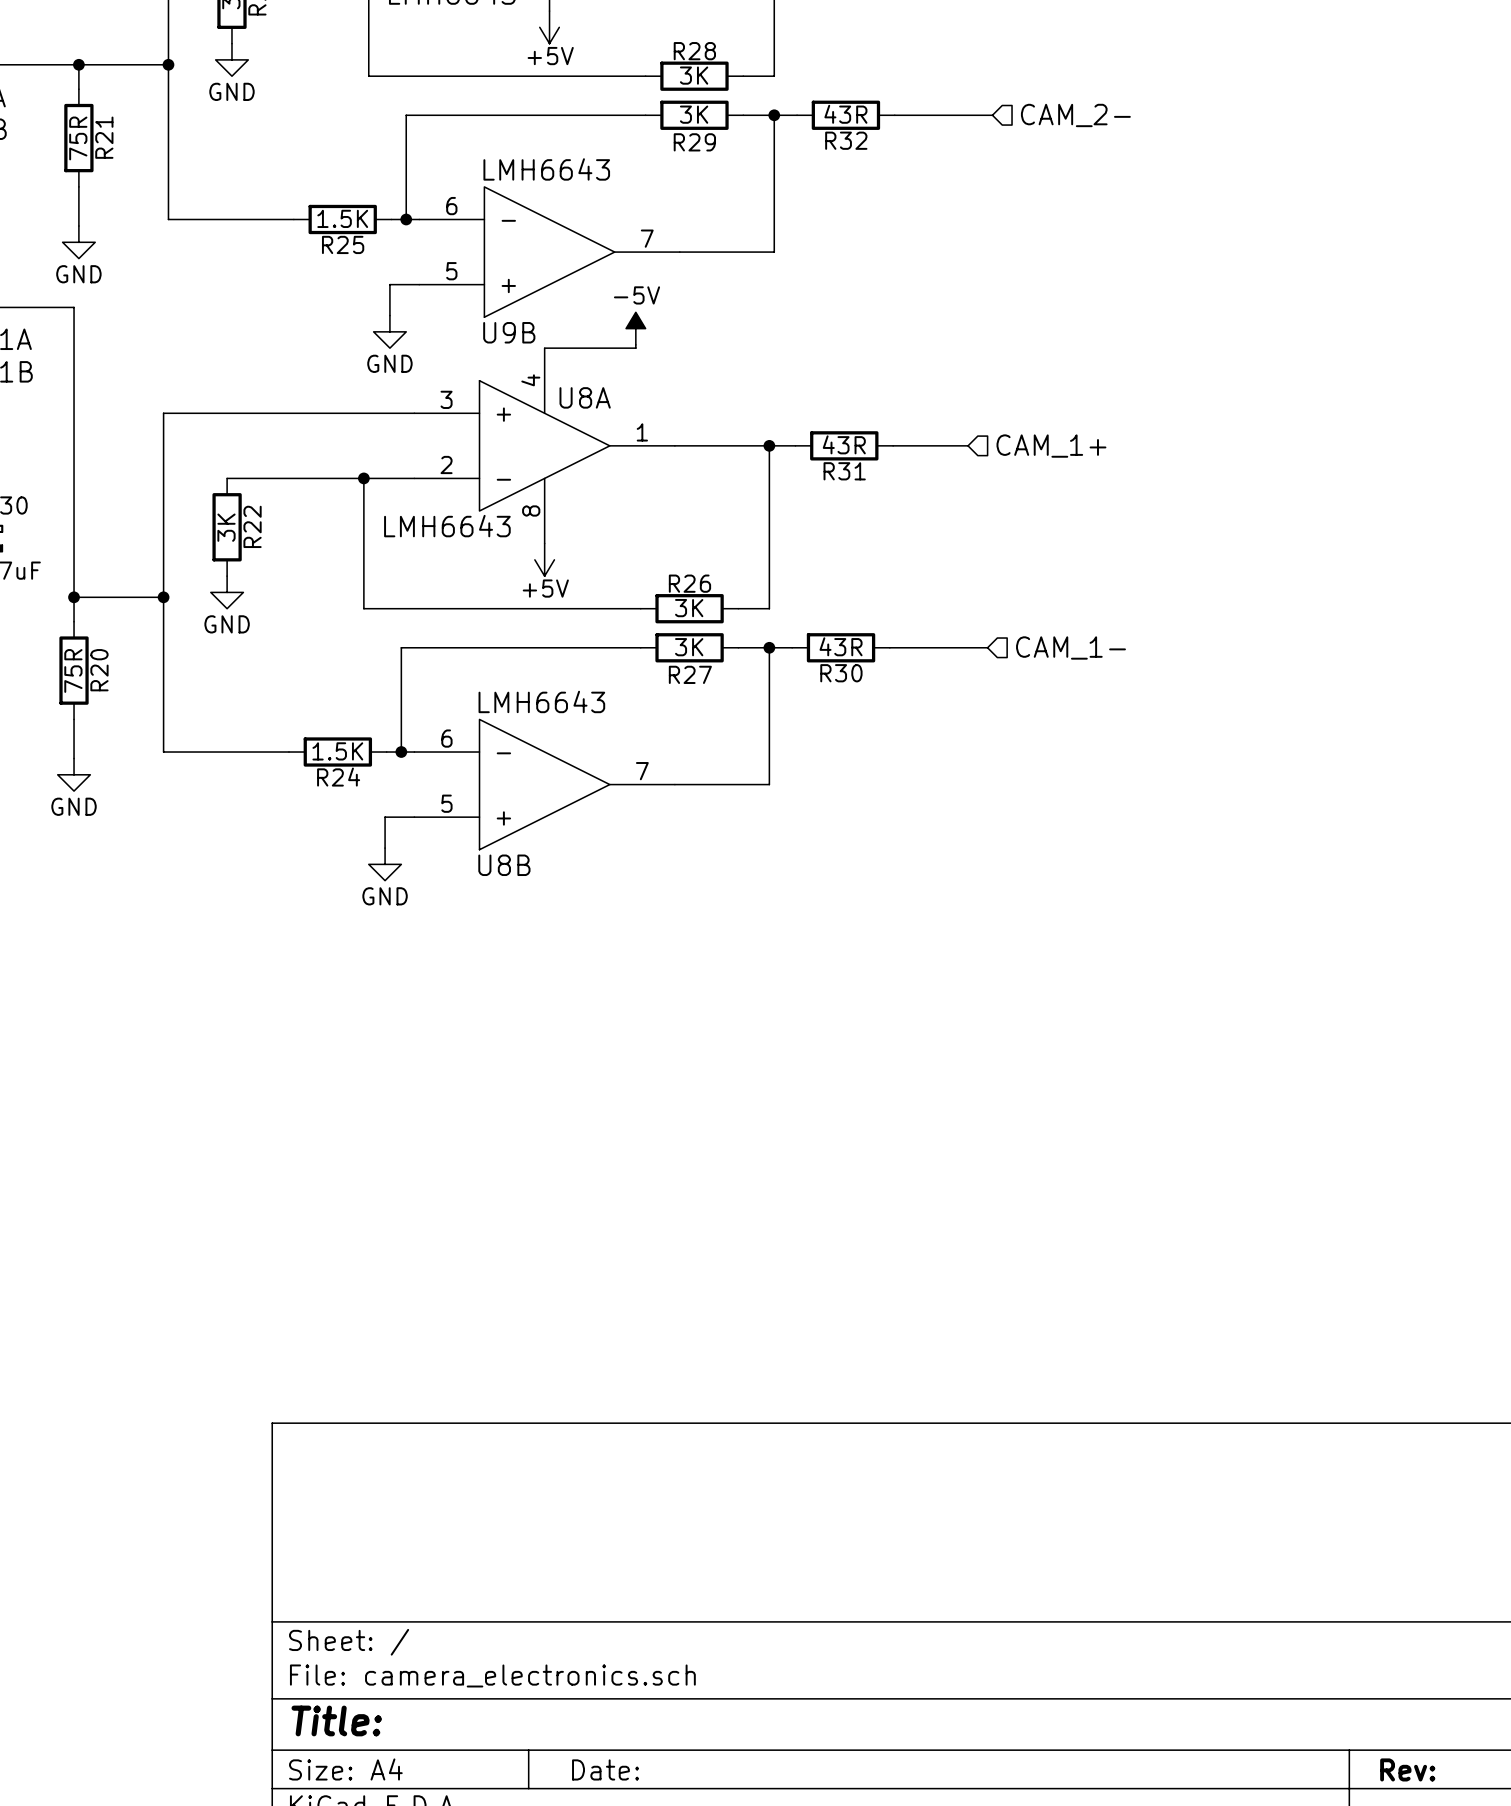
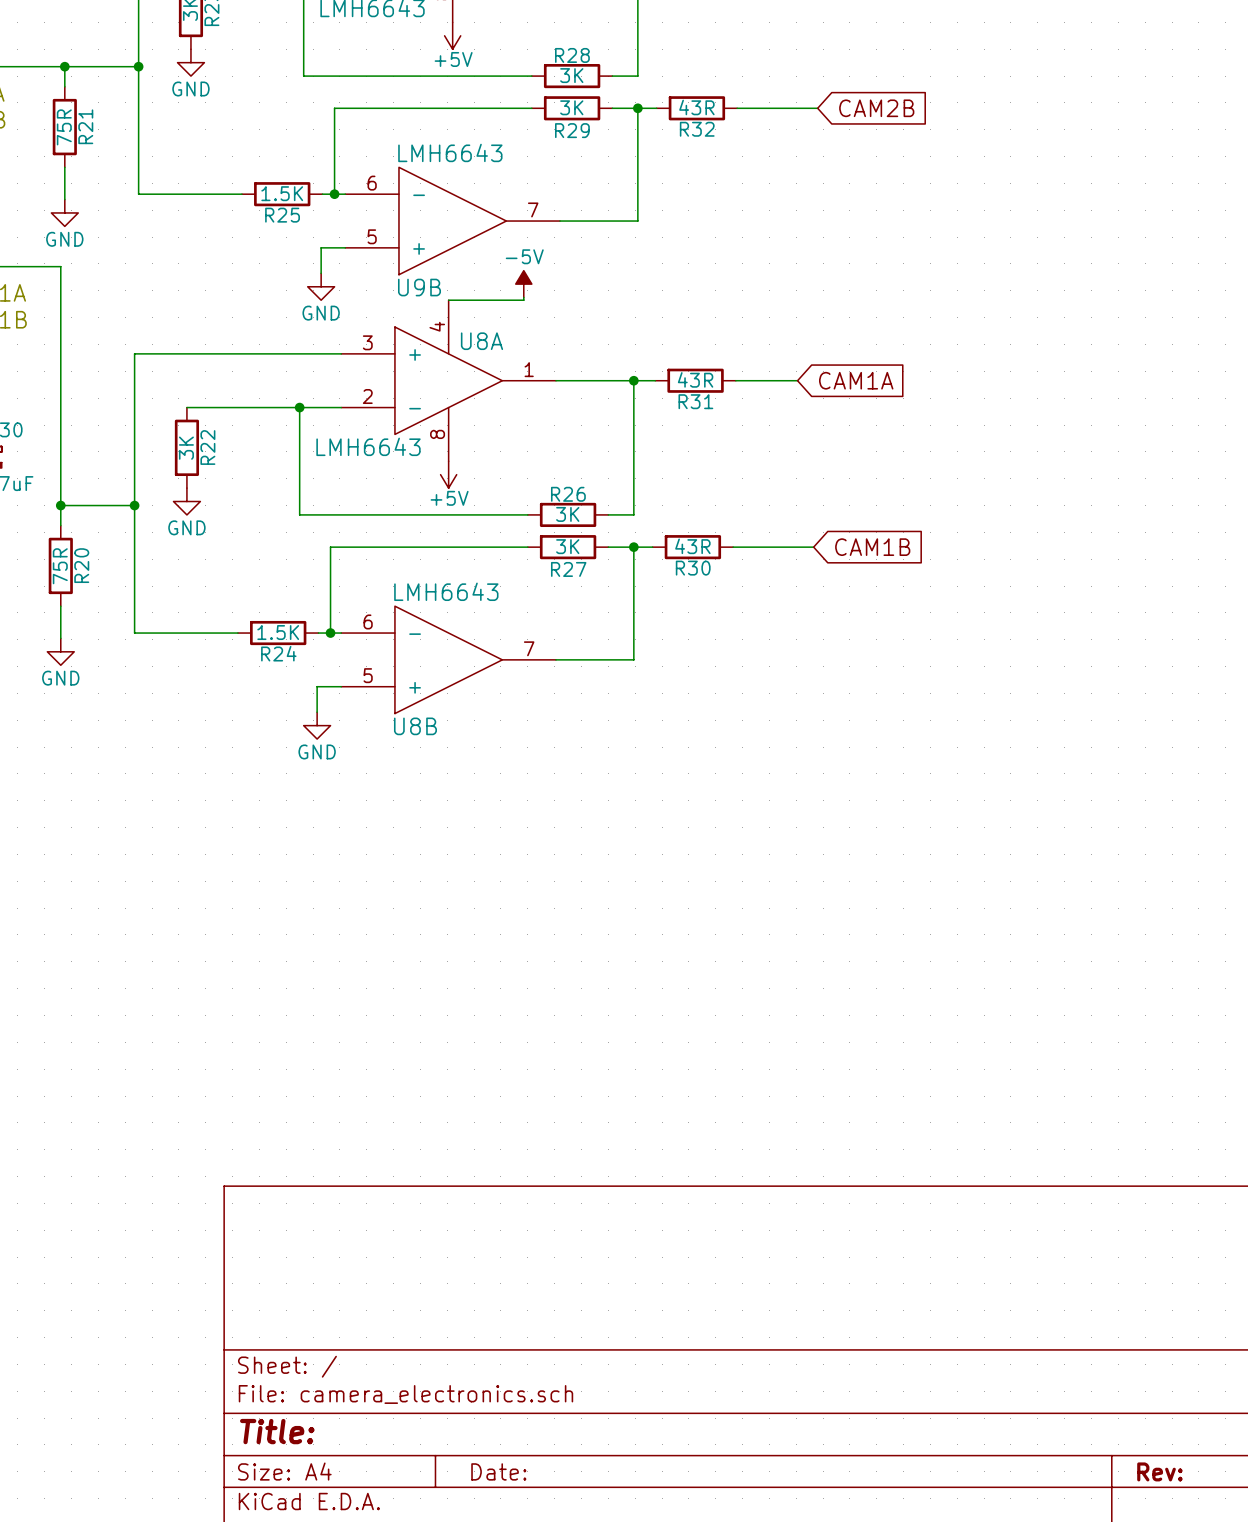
global label: none -> CAM2B (876, 108)
hierarchical label: CAM_2- (1075, 115) -> none
global label: none -> CAM1A (856, 380)
hierarchical label: CAM_1+ (1051, 446) -> none
global label: none -> CAM1B (872, 547)
hierarchical label: CAM_1- (1071, 647) -> none

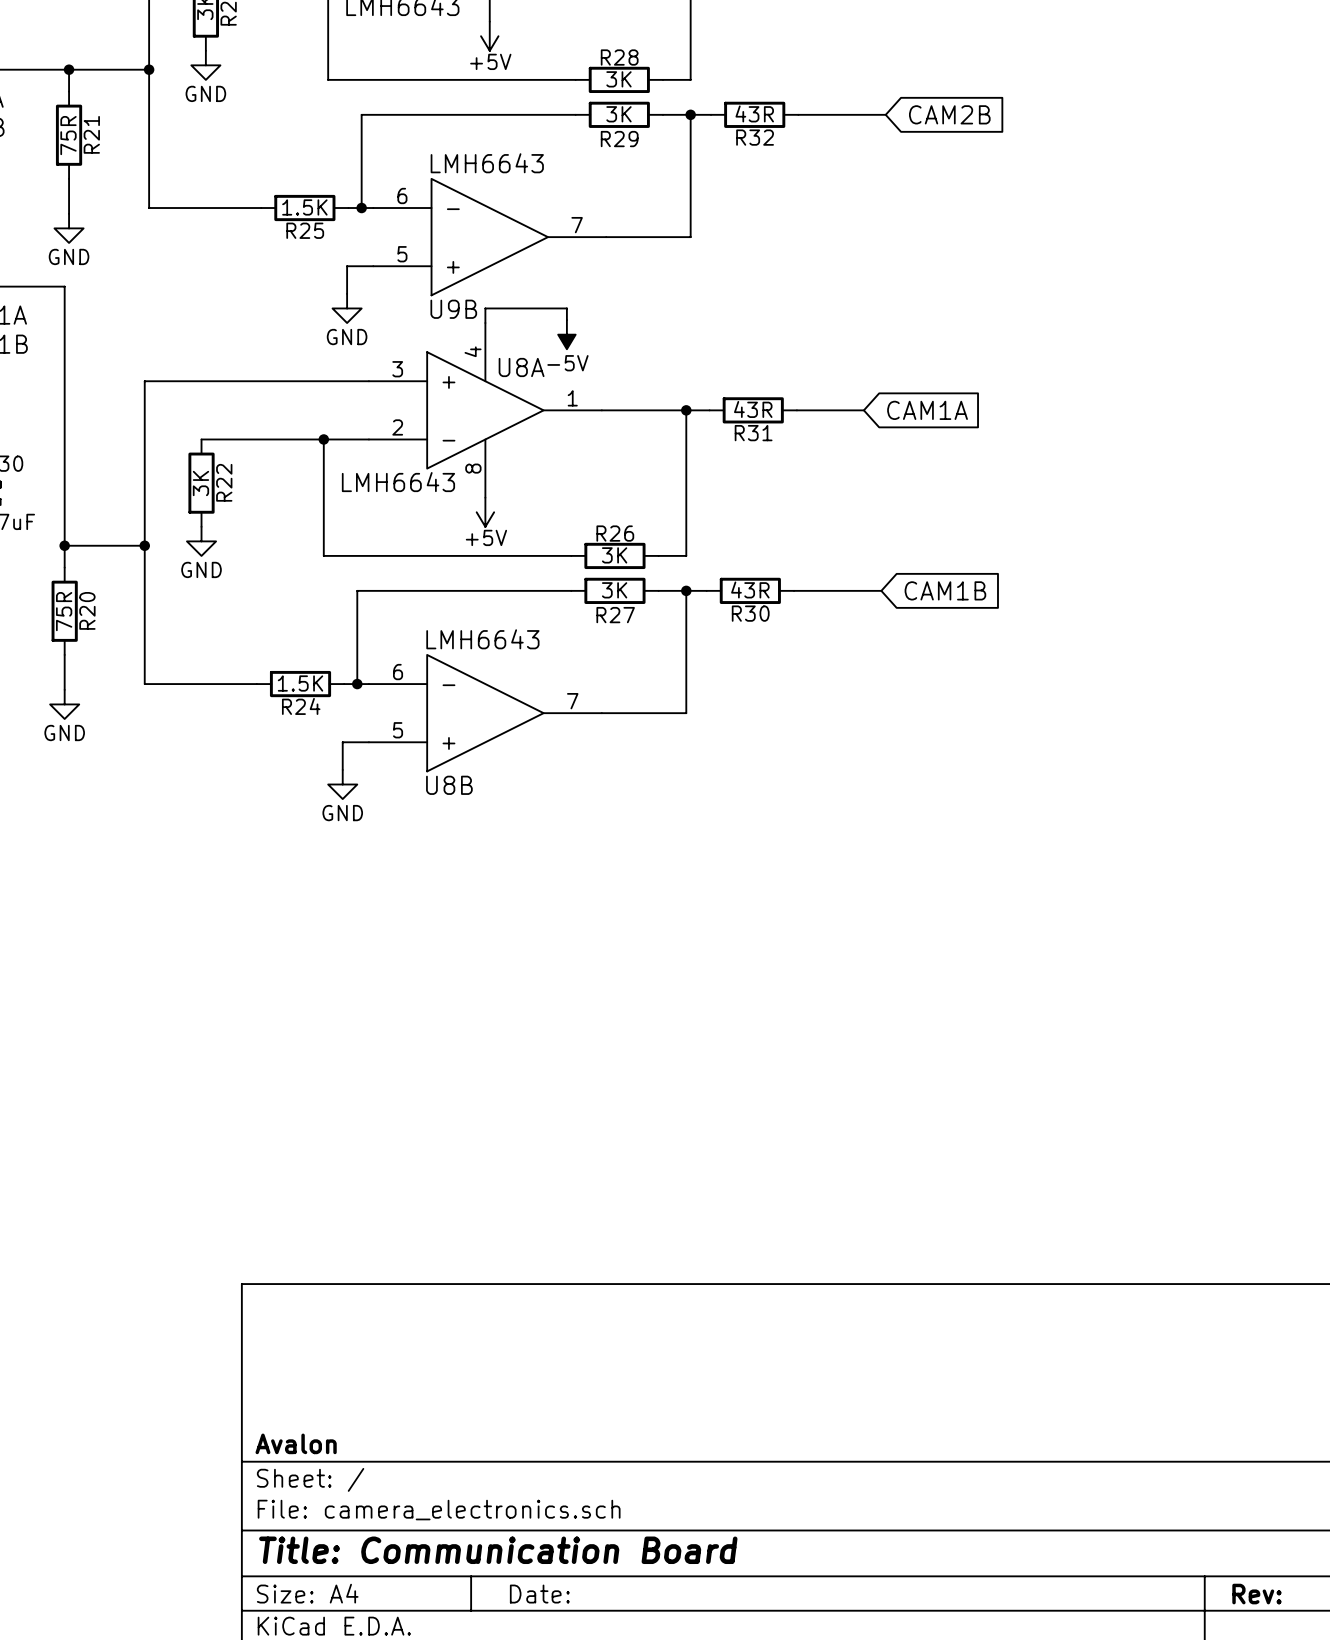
power symbol rotation: 0° (523, 284) -> 180° (566, 334)
power symbol position: -5V (523, 284) -> -5V (566, 334)
wire: (523, 297) (523, 300) (448, 300) -> (566, 320) (566, 308) (485, 308) (485, 323)
title block: none -> Avalon (296, 1443)
title block: Title: (277, 1431) -> Title: Communication Board (498, 1550)

